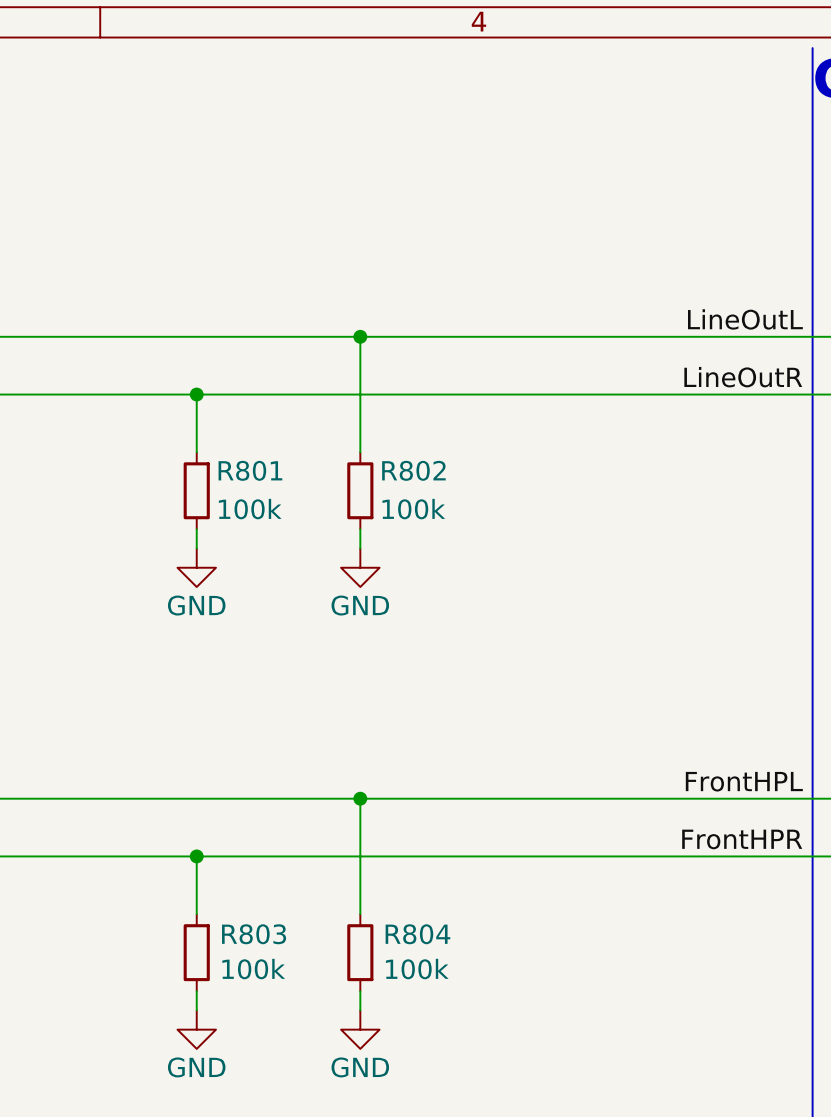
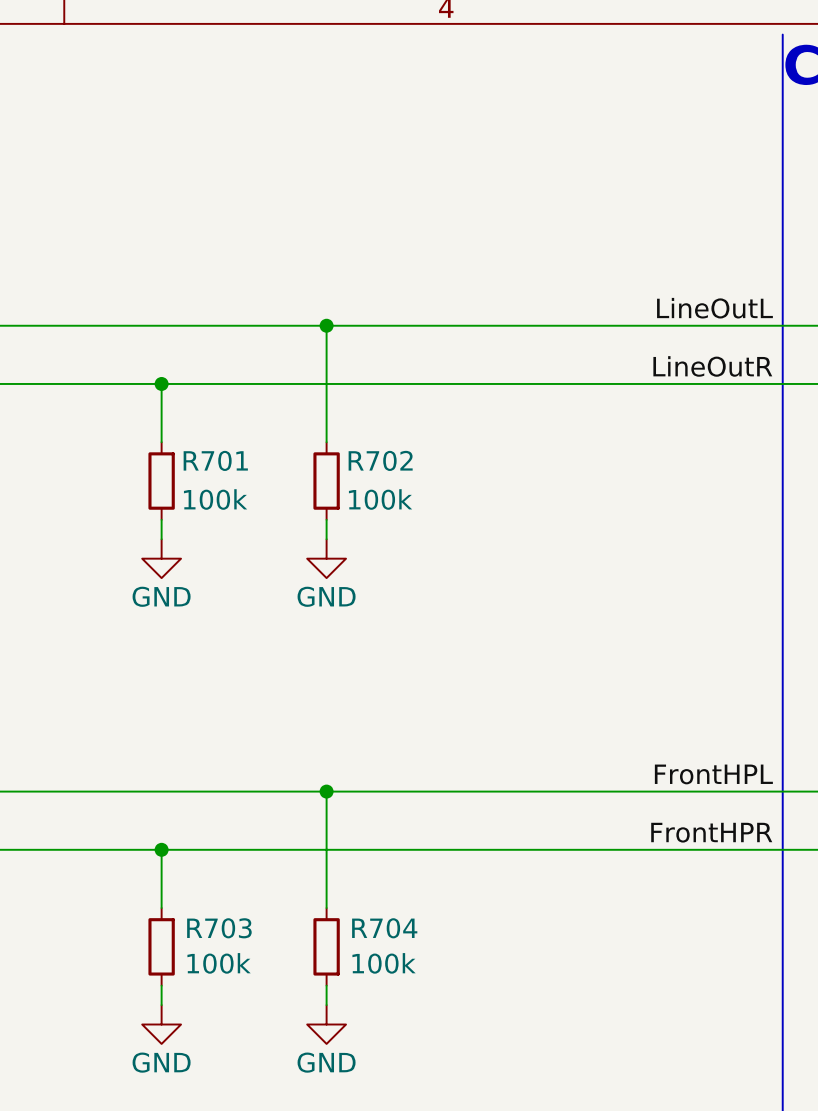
R801 name: R801 (250, 470) -> R701 (215, 460)
R802 name: R802 (413, 470) -> R702 (380, 460)
R803 name: R803 (254, 934) -> R703 (219, 928)
R804 name: R804 (417, 934) -> R704 (384, 928)

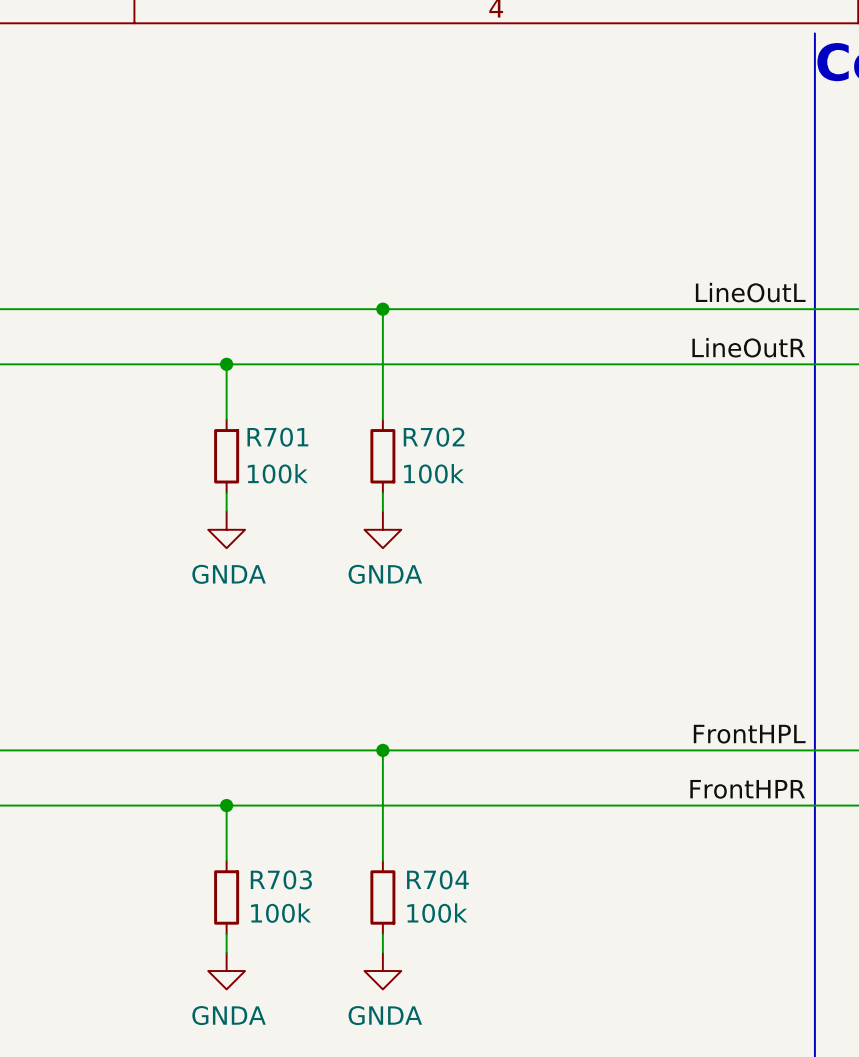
power symbol: GND (161, 558) -> GNDA (226, 529)
power symbol: GND (326, 558) -> GNDA (382, 529)
power symbol: GND (161, 1024) -> GNDA (226, 971)
power symbol: GND (326, 1024) -> GNDA (382, 971)

